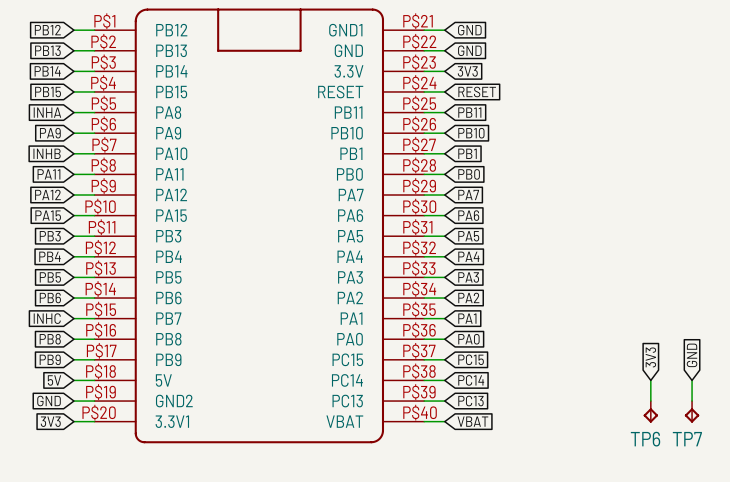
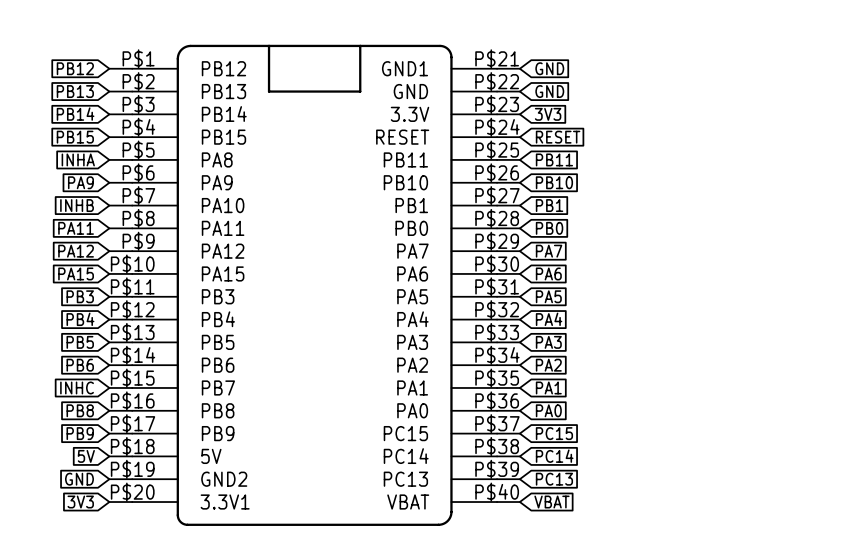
global label: GND (692, 355) -> none
global label: 3V3 (650, 357) -> none
wire: (650, 380) (650, 401) -> none
wire: (692, 380) (692, 401) -> none
TP6: (650, 411) -> none
TP7: (692, 411) -> none

